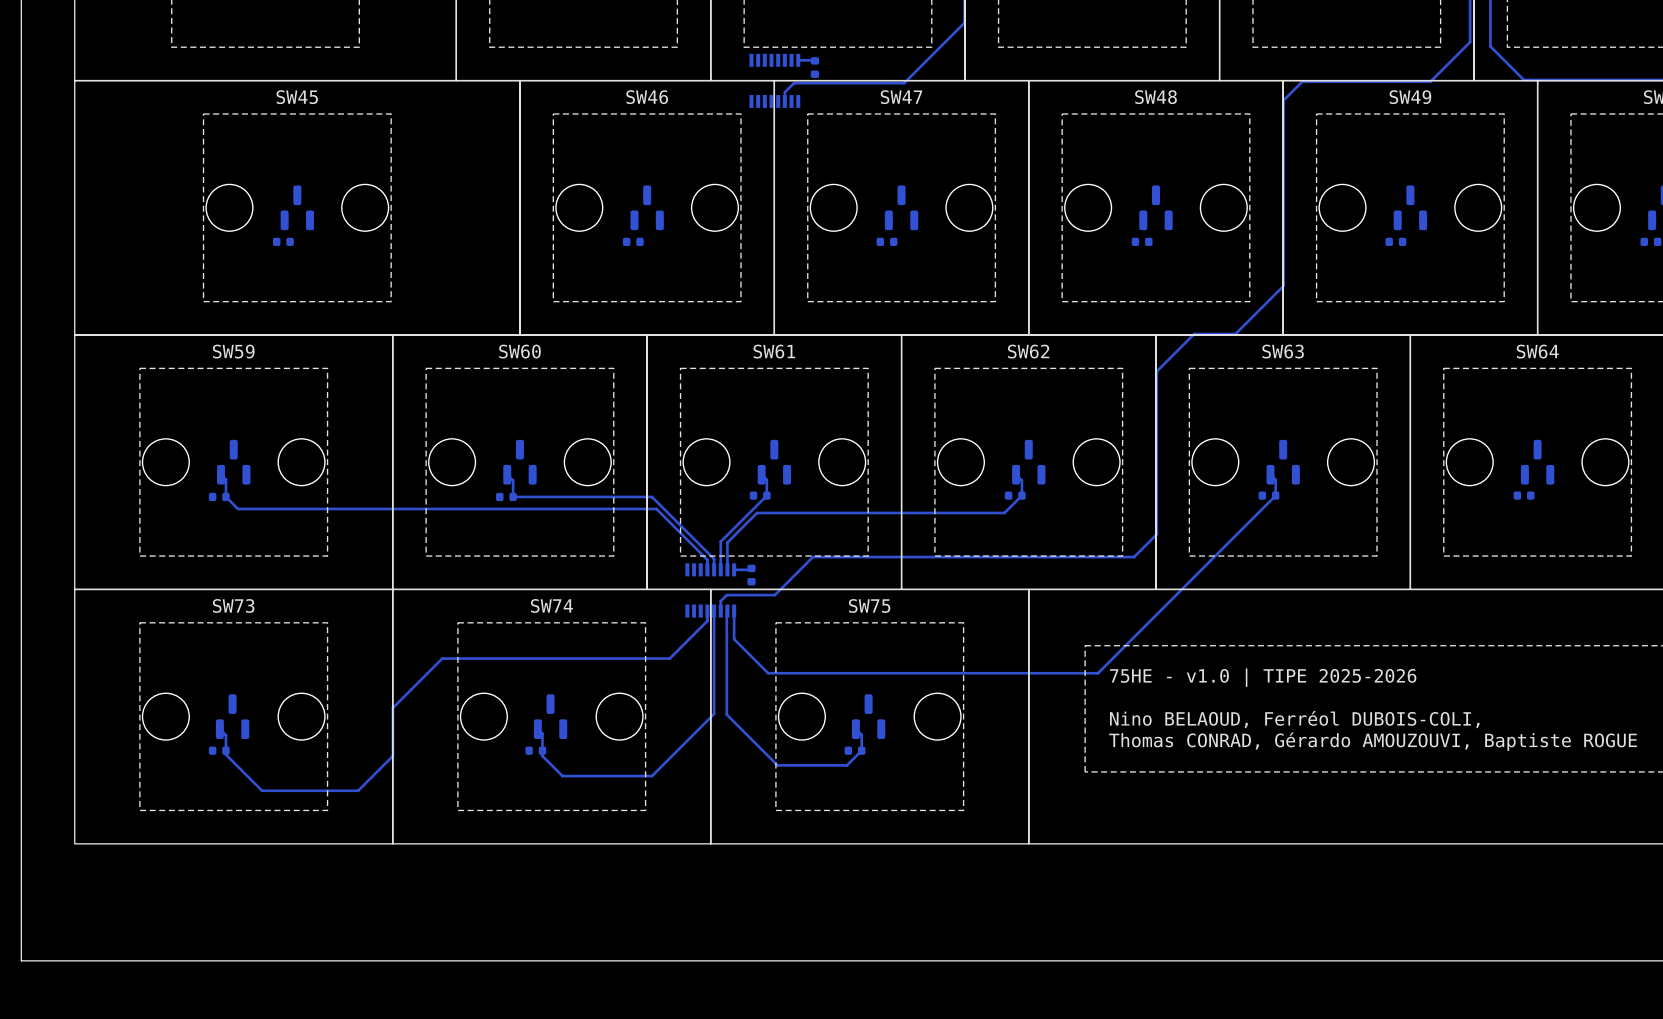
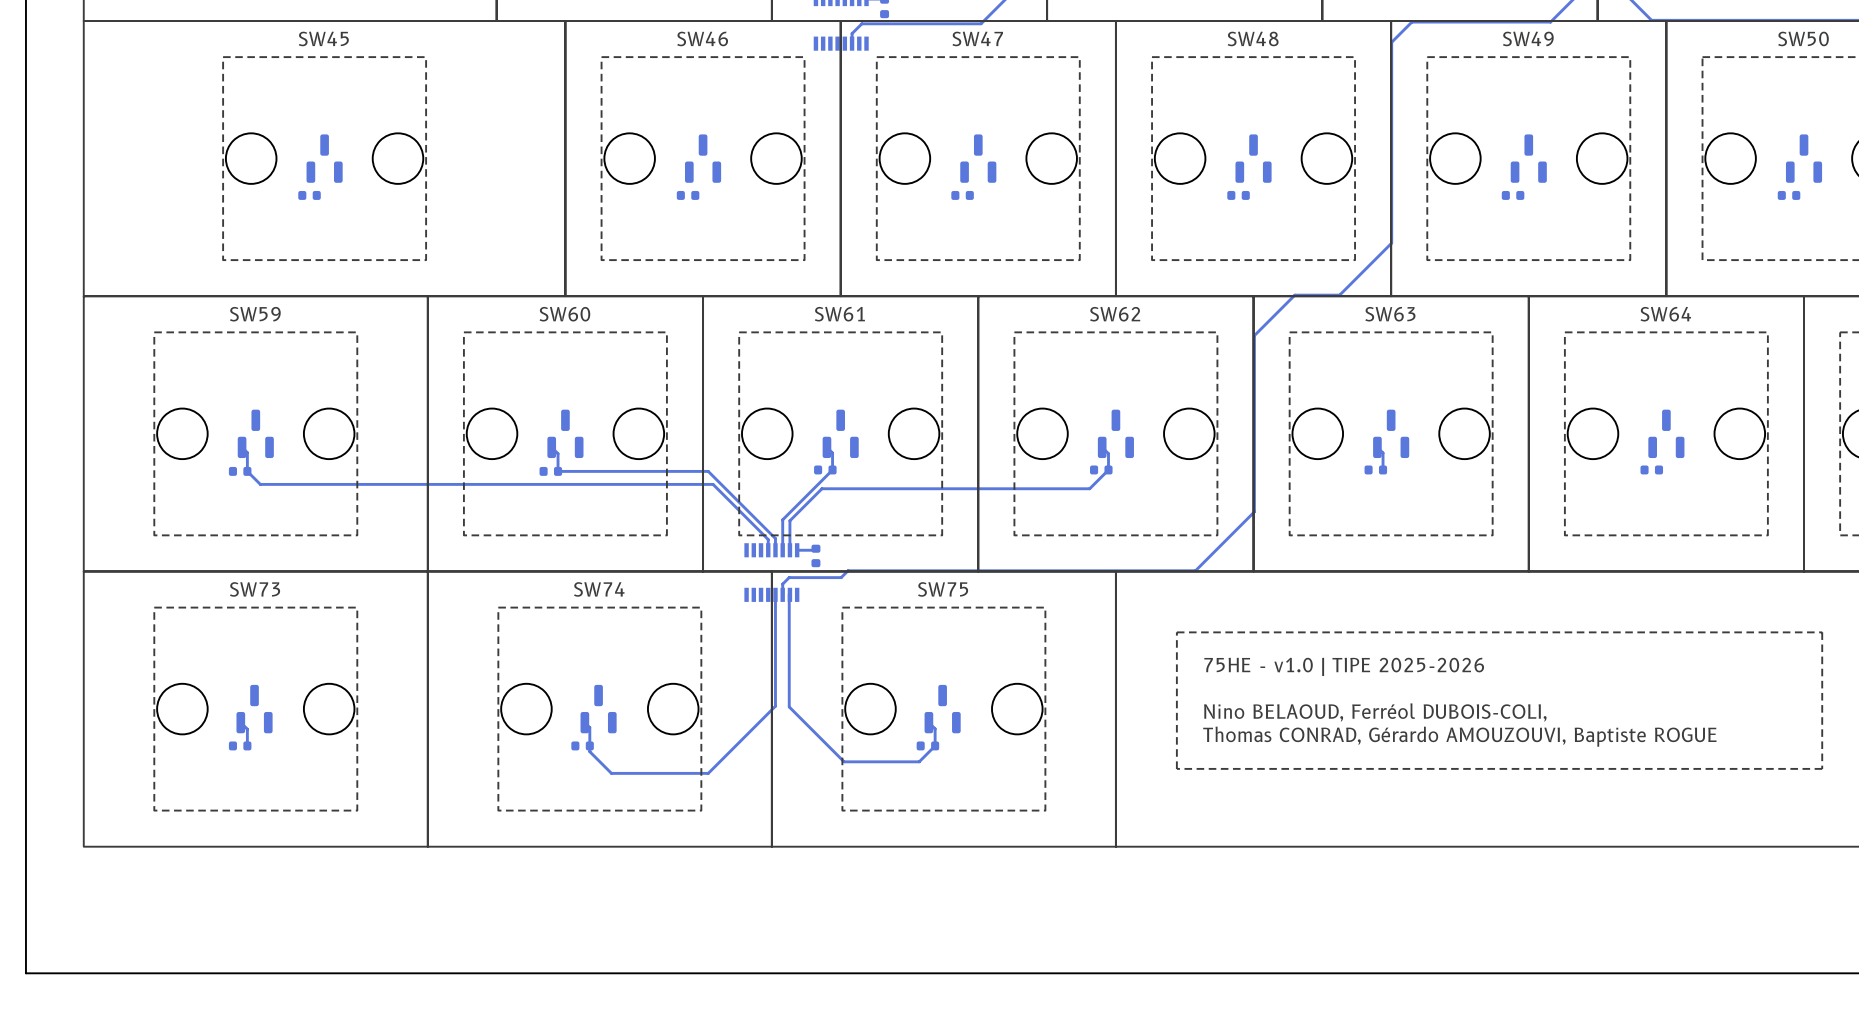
bottom track: (1275, 495) (1098, 673) (768, 673) (734, 639) (734, 611) -> none
bottom track: (1134, 557) (812, 557) (781, 588) -> (1229, 536) (1195, 570) (848, 570)
bottom track: (707, 611) (707, 620) (669, 658) (442, 658) (392, 707) (392, 756) (358, 790) (262, 790) (225, 754) (225, 750) -> none

